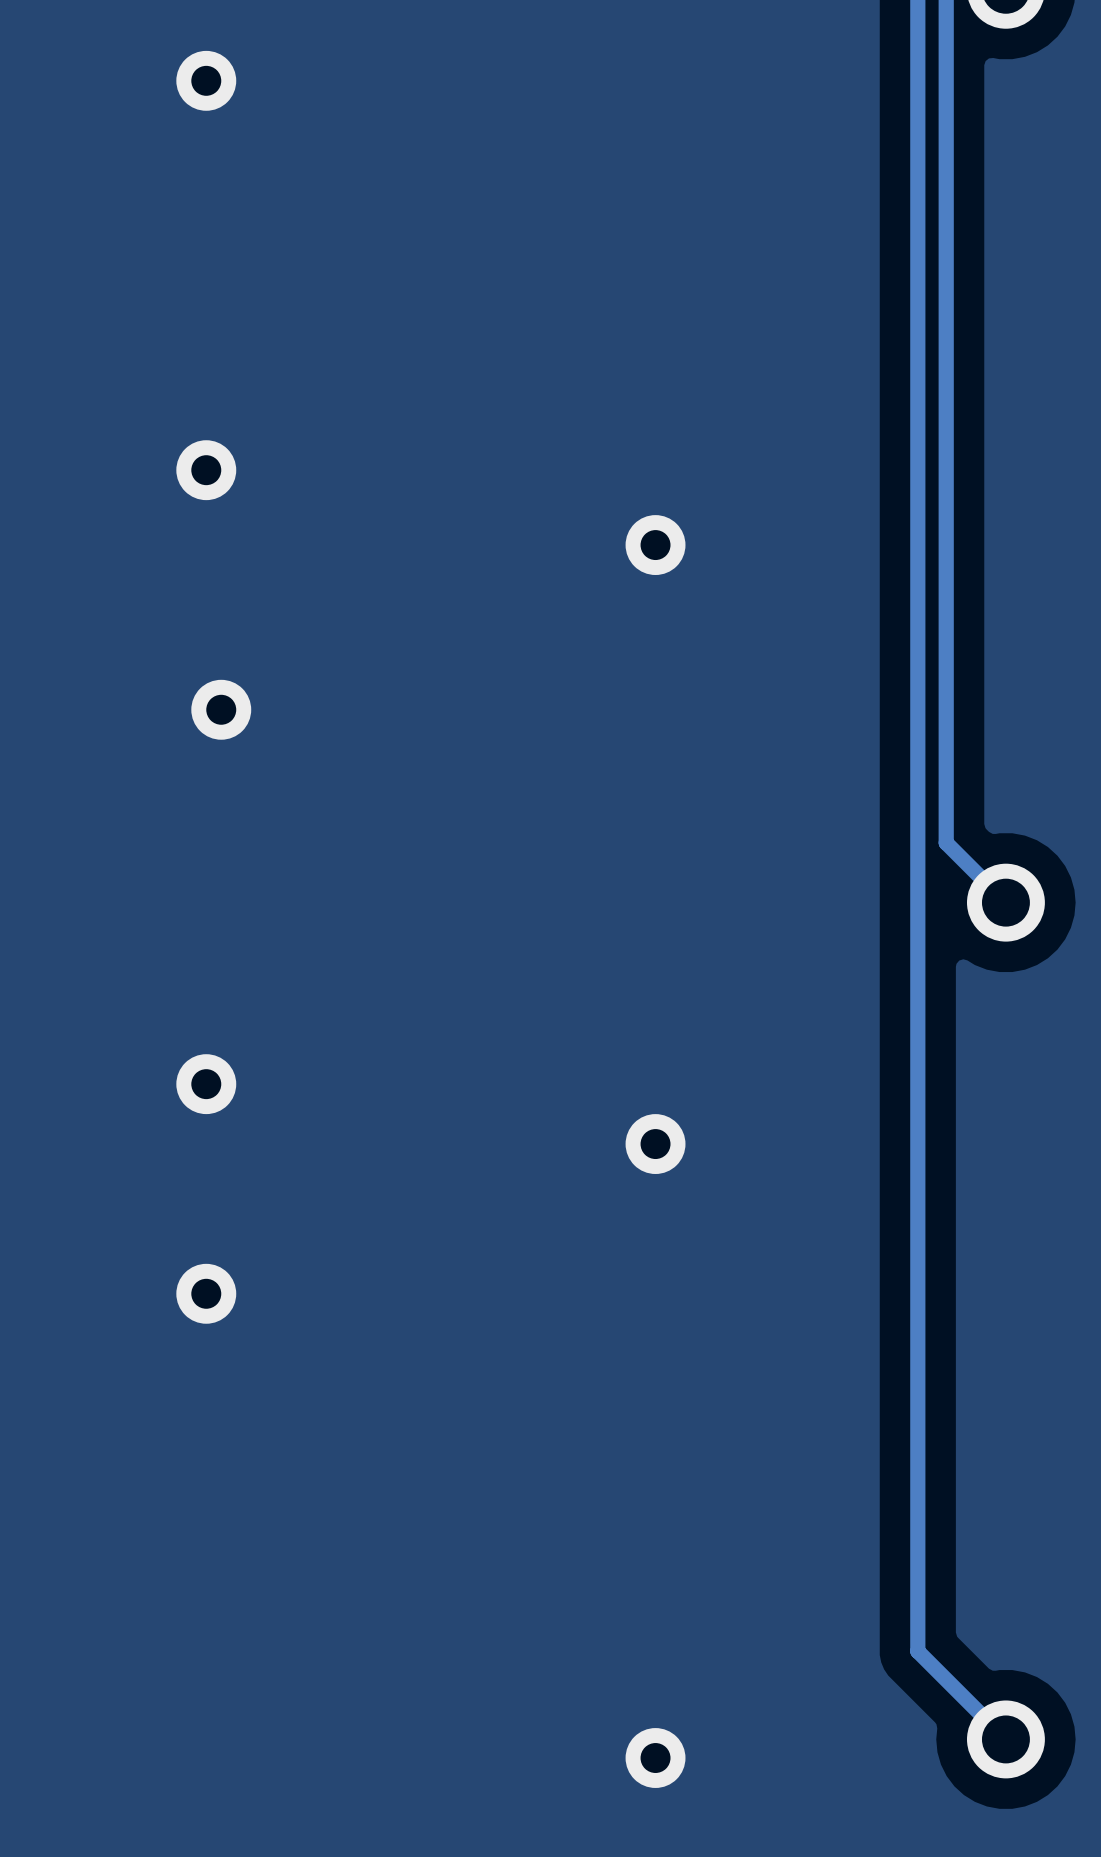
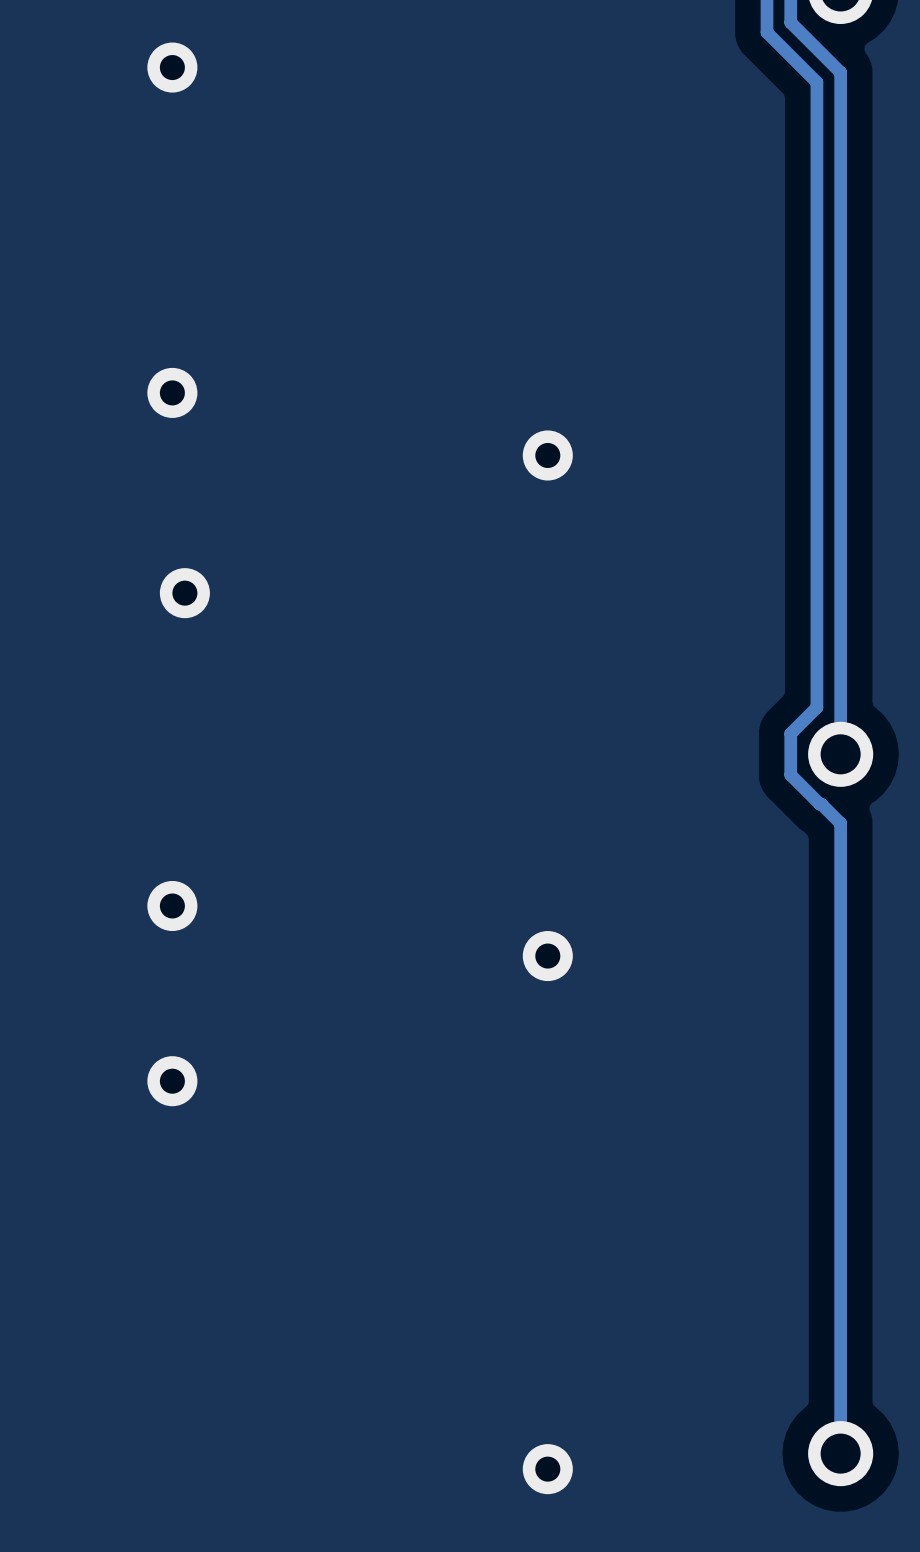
track: (946, 27) (946, 842) (1005, 902) -> (790, 22) (840, 72) (840, 754)
track: (917, 38) (917, 1651) (1005, 1739) -> (767, 32) (816, 82) (816, 707) (790, 733) (790, 775) (840, 823) (840, 1453)

